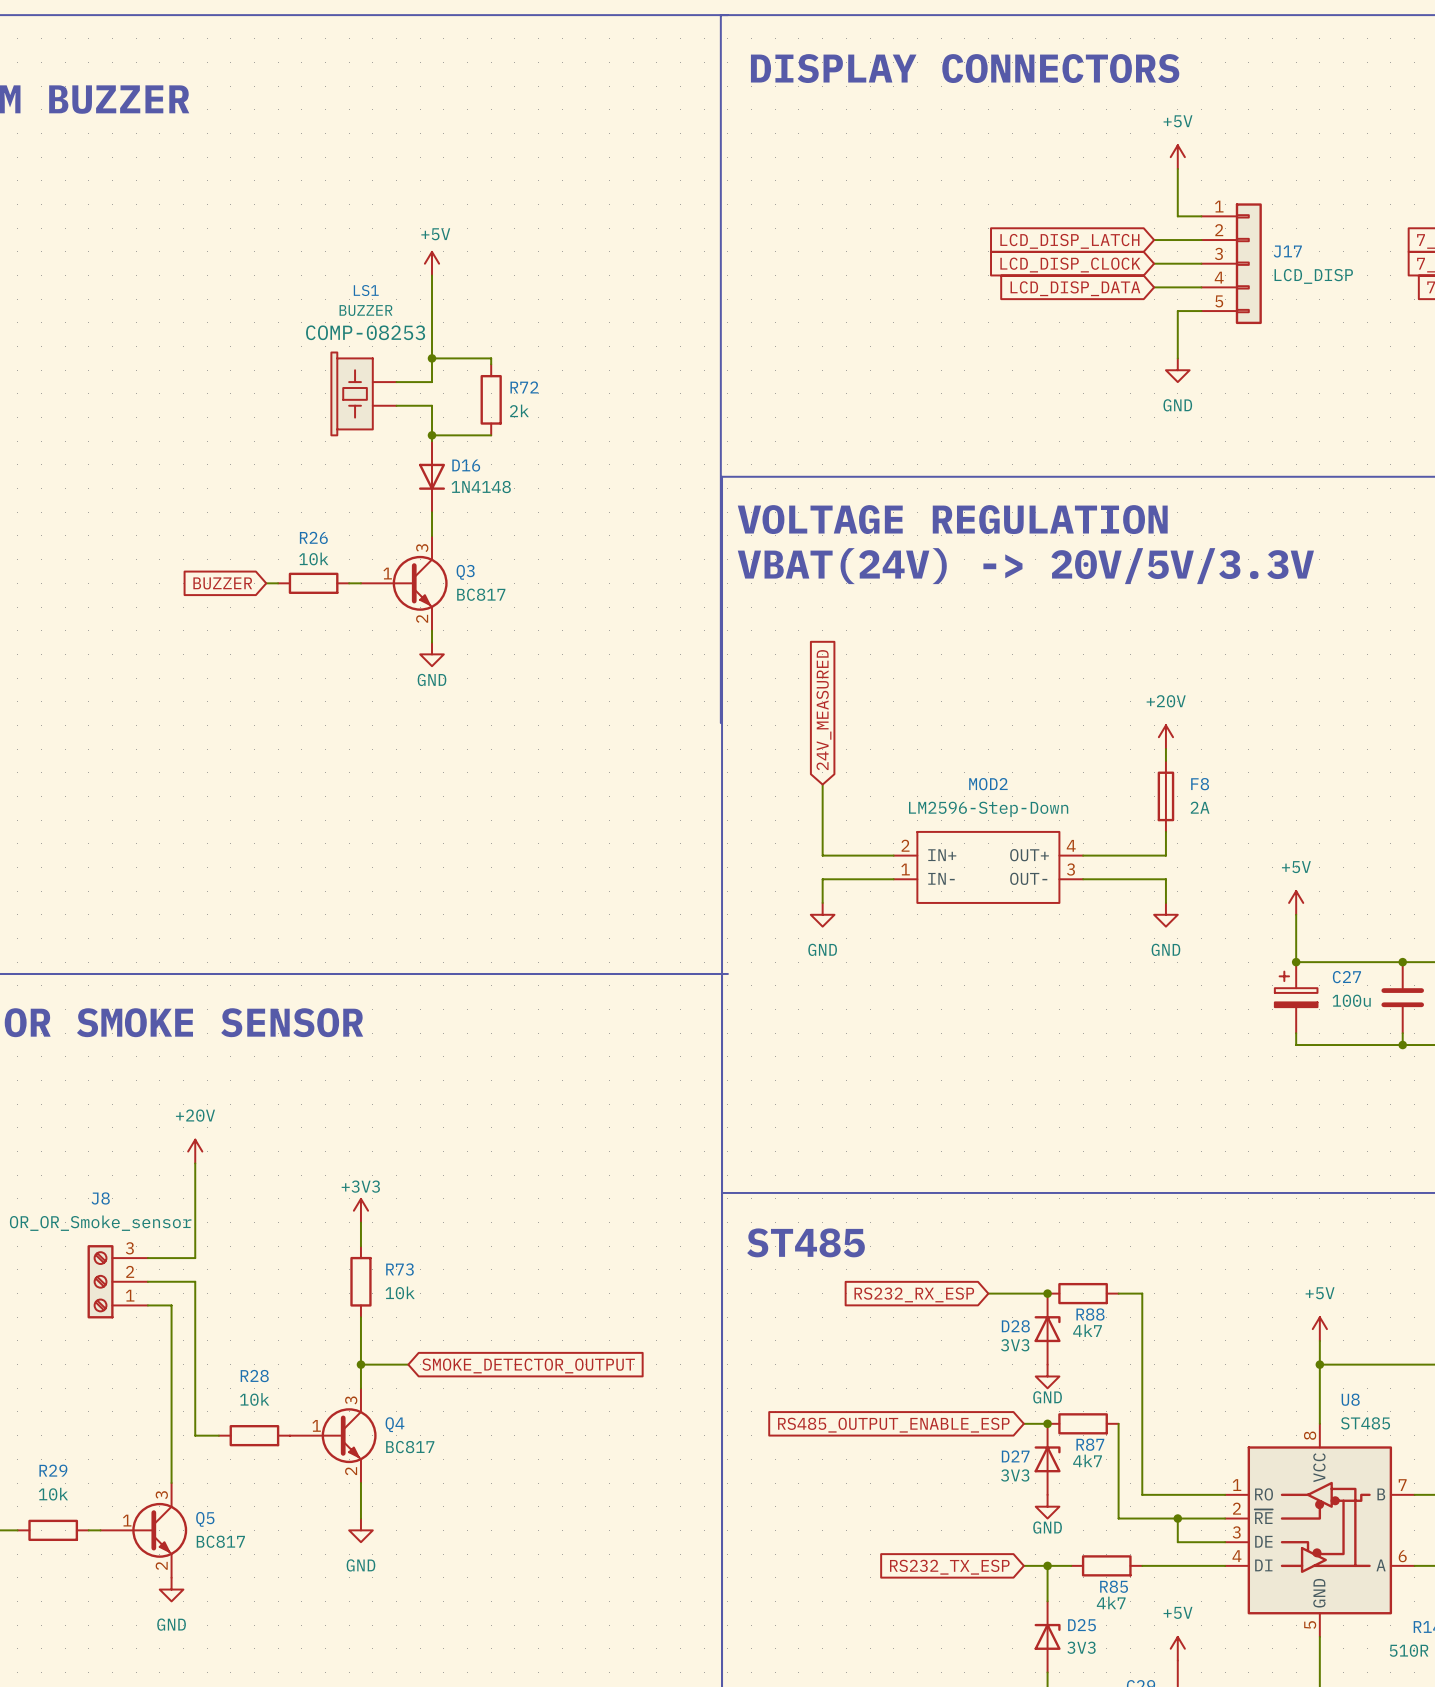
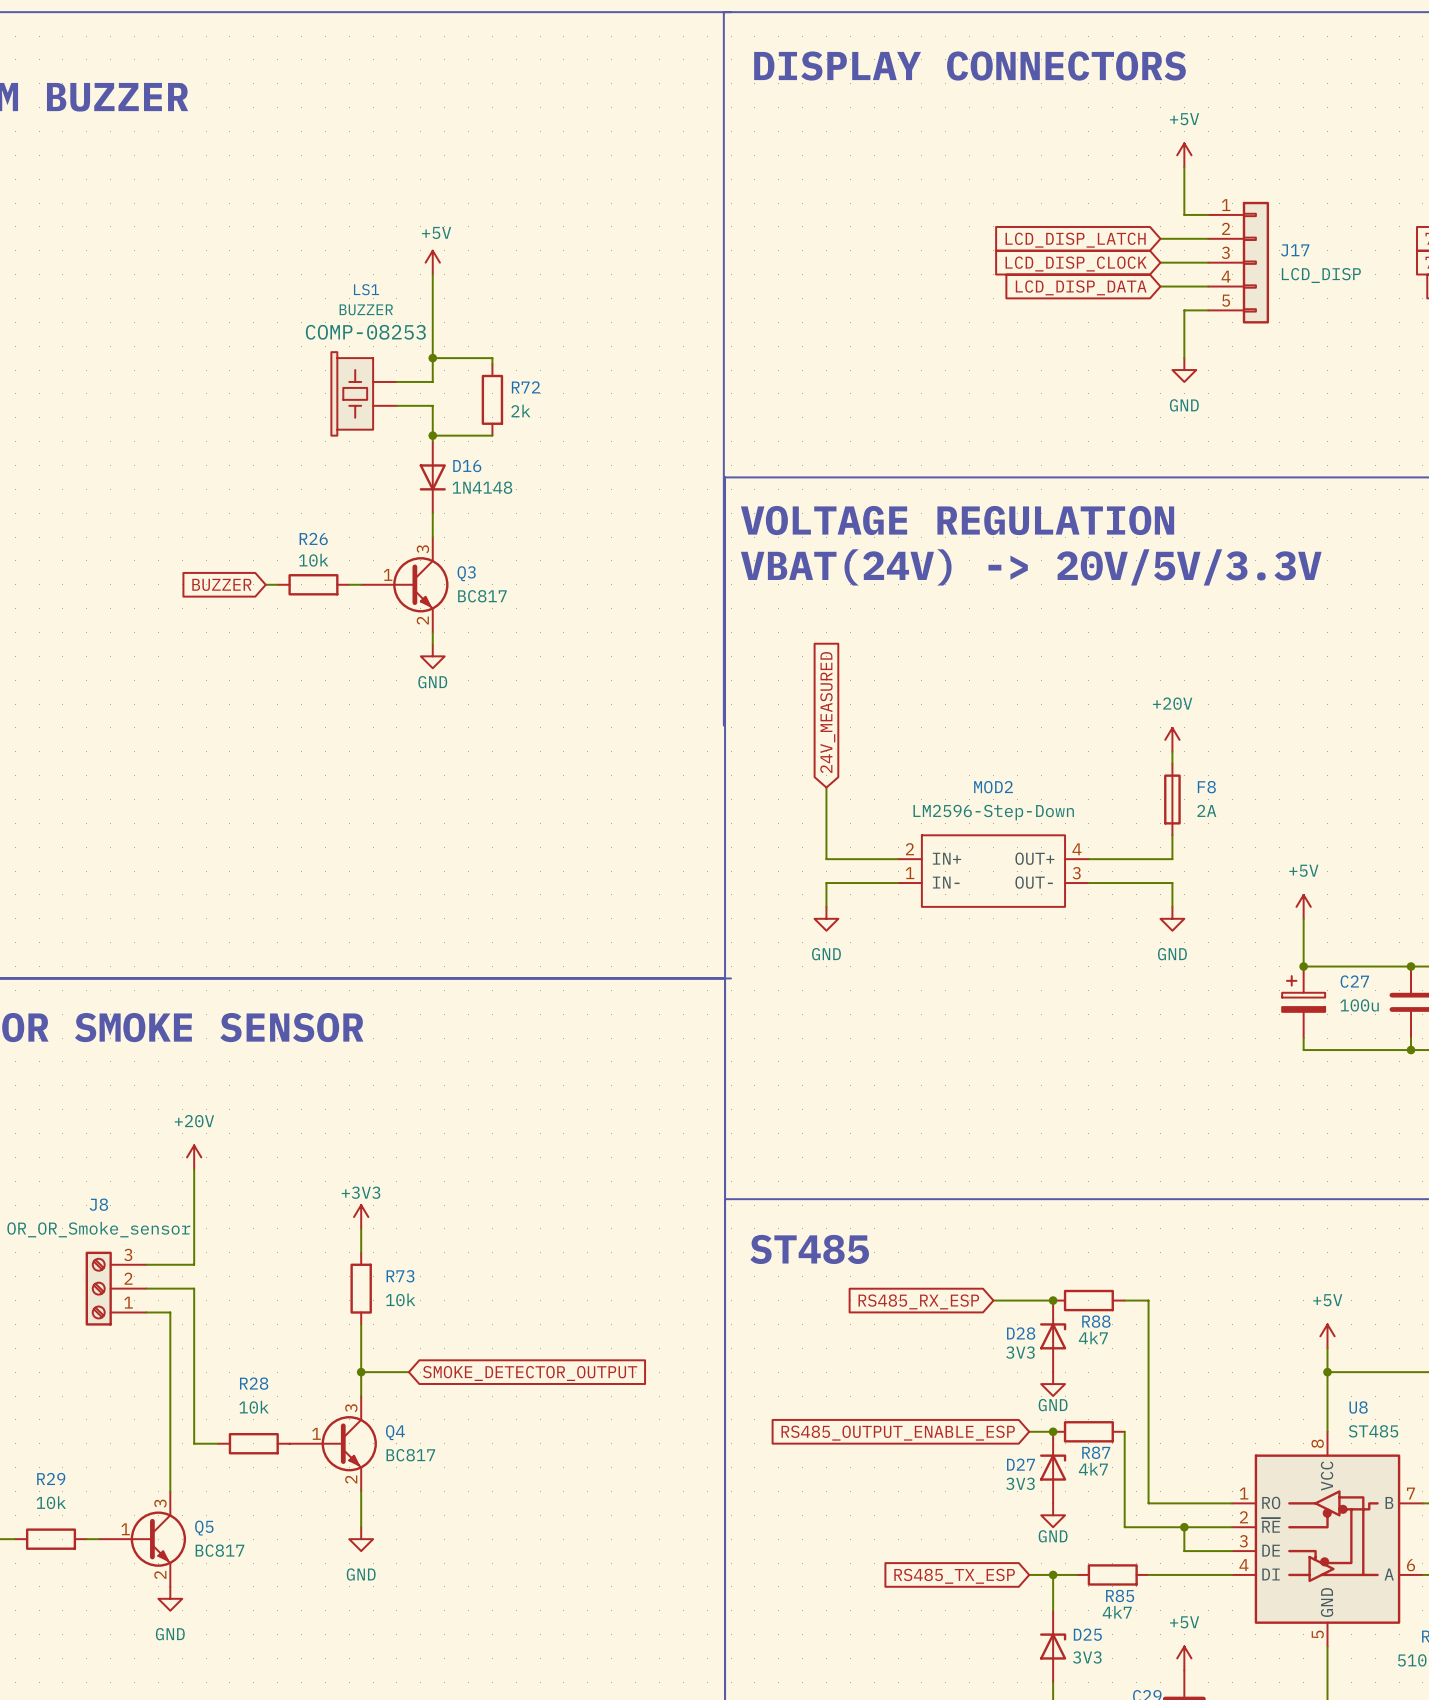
global label: RS232_RX_ESP (914, 1294) -> RS485_RX_ESP (918, 1301)
global label: RS232_TX_ESP (949, 1567) -> RS485_TX_ESP (954, 1576)

